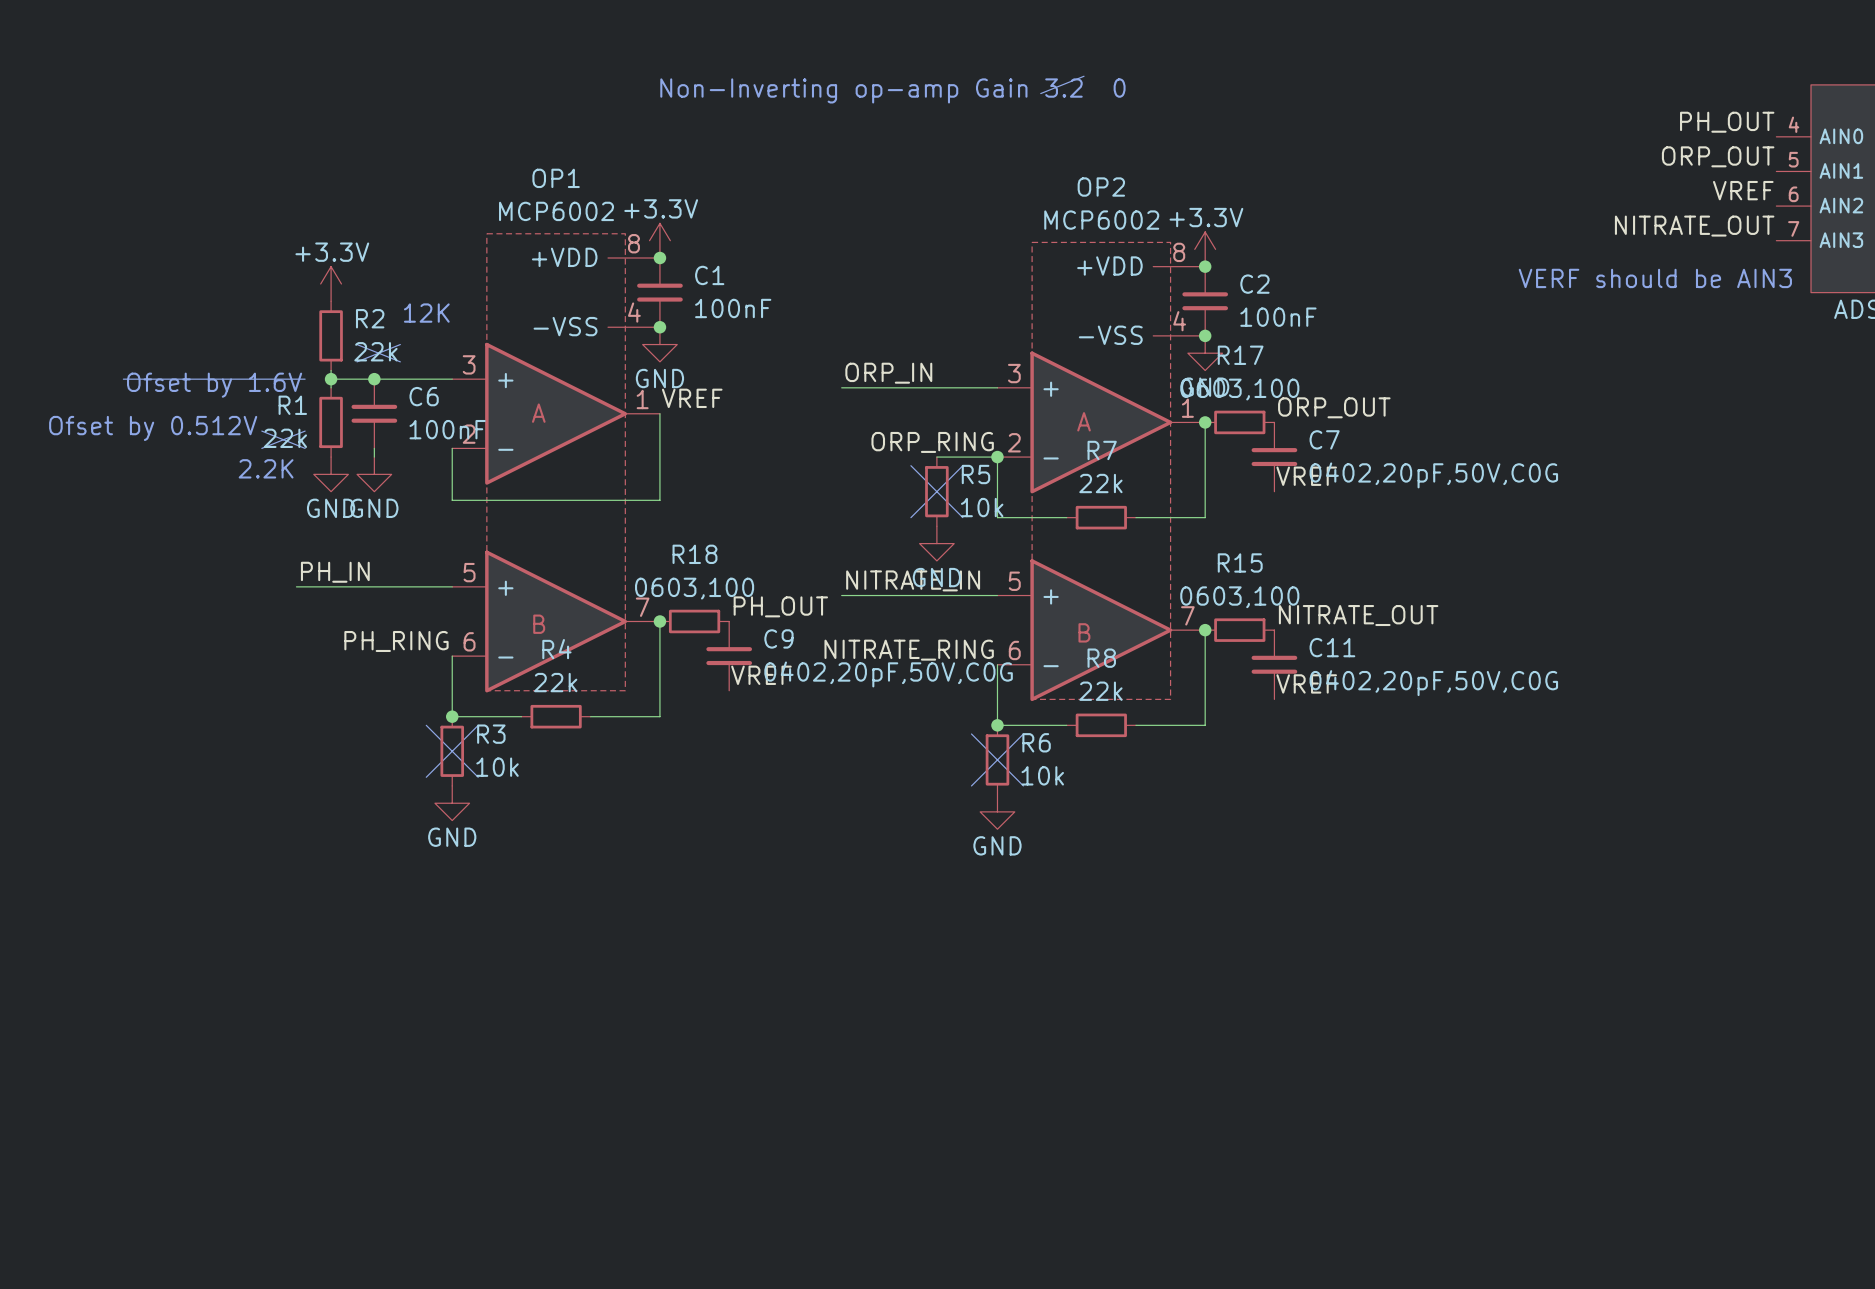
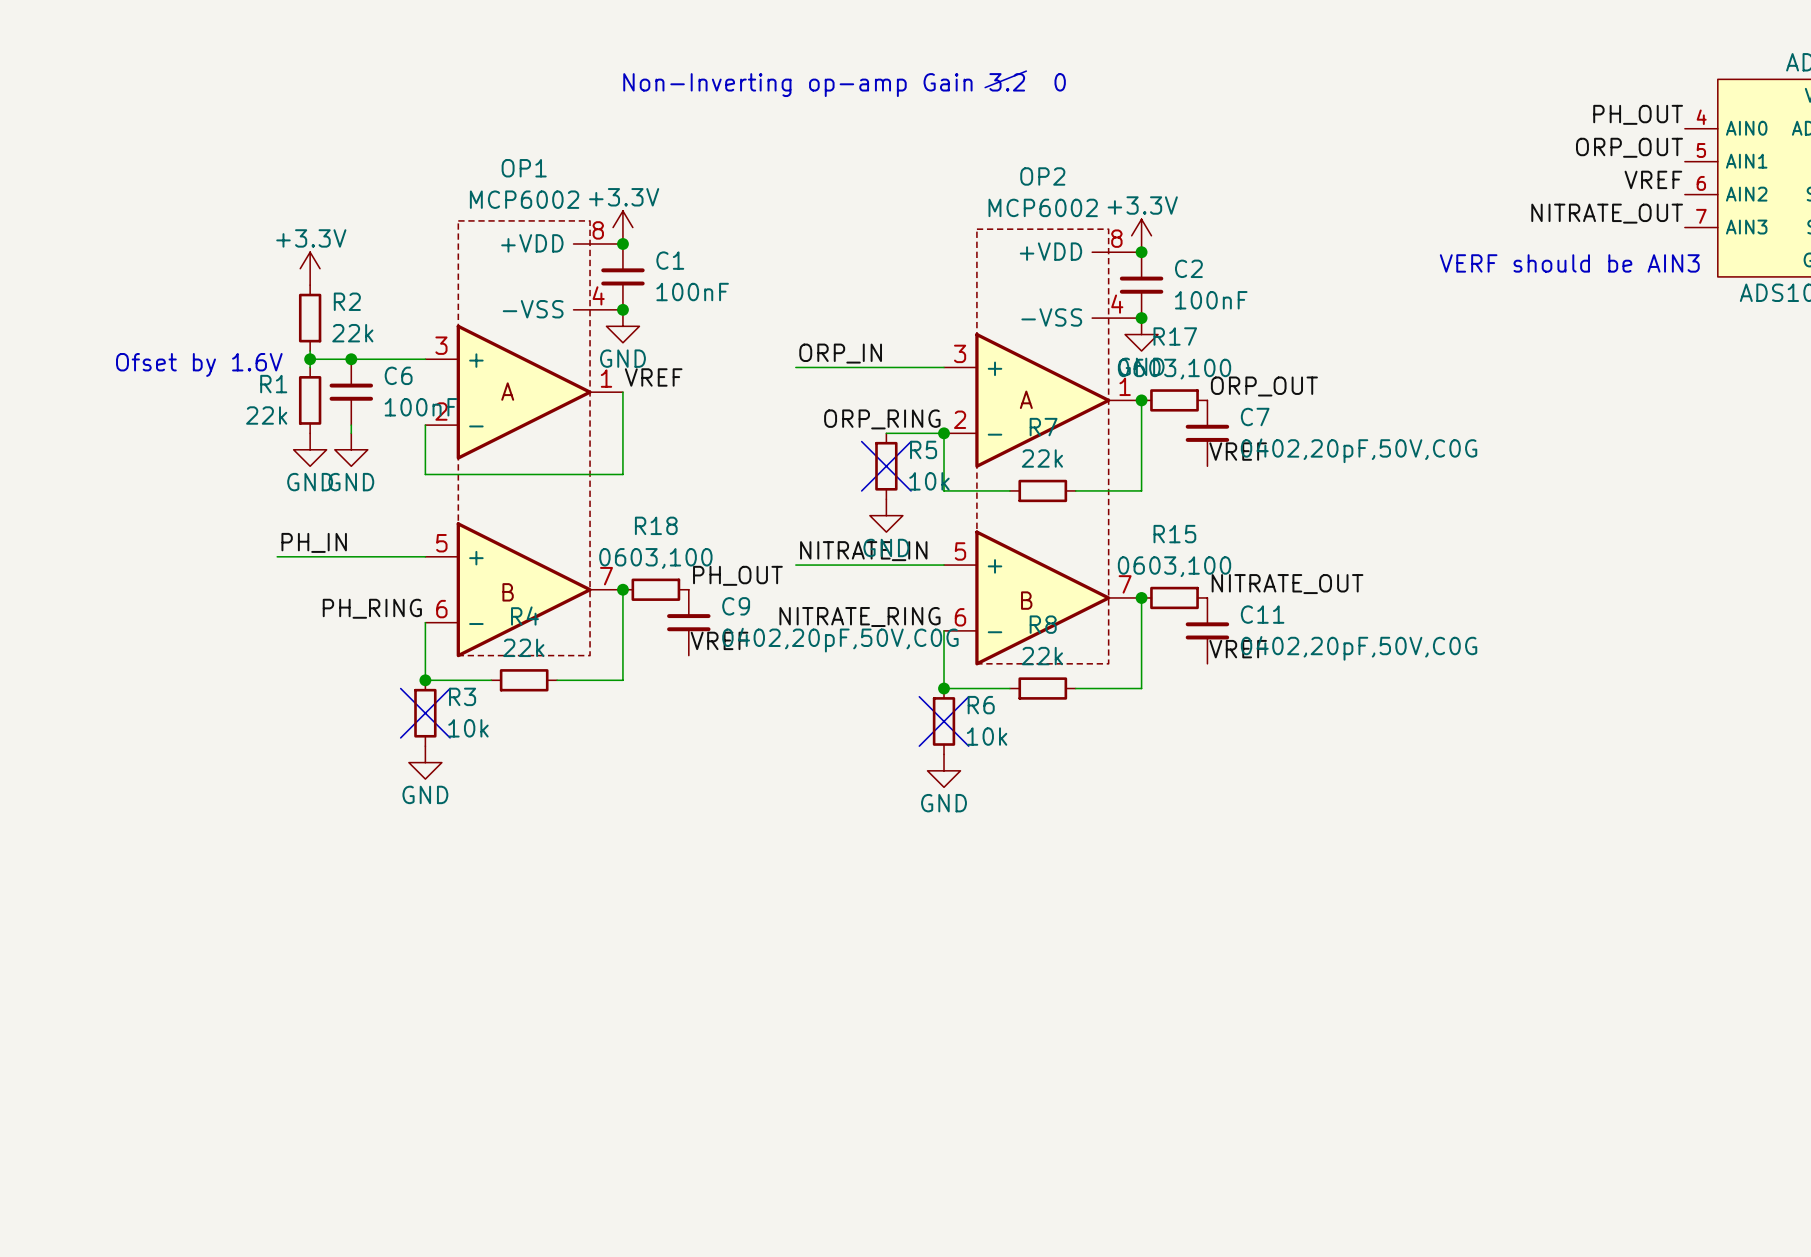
text: 12K (426, 313) -> none
line: (357, 344) (400, 361) -> none
line: (400, 344) (357, 361) -> none
line: (123, 379) (305, 379) -> none
text: Ofset by 0.512V (153, 428) -> none
line: (261, 431) (305, 448) -> none
line: (305, 431) (261, 448) -> none
text: 2.2K (266, 468) -> none

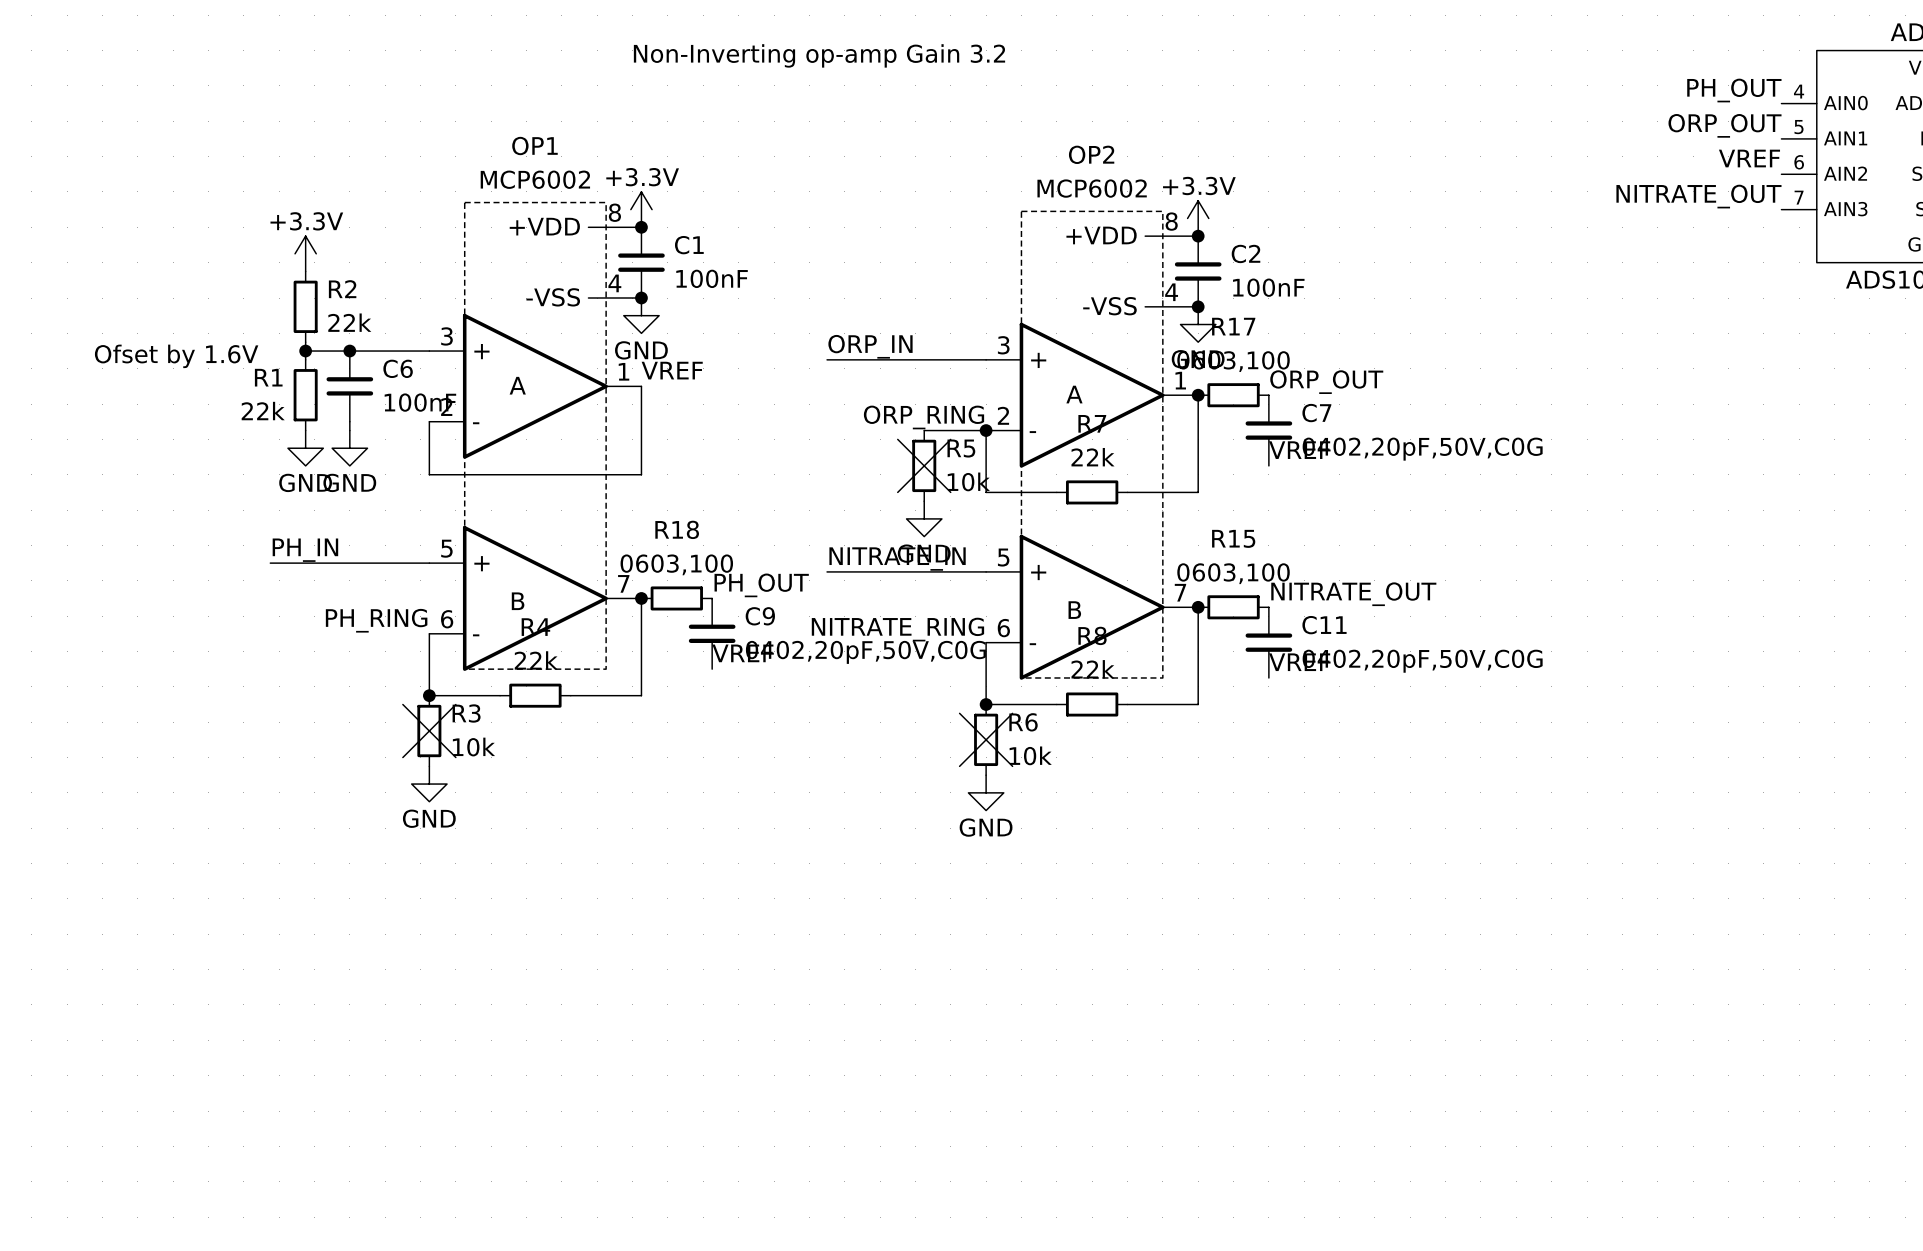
line: (1026, 71) (985, 87) -> none
text: 0 (1060, 82) -> none
text: VERF should be AIN3 (1569, 263) -> none

